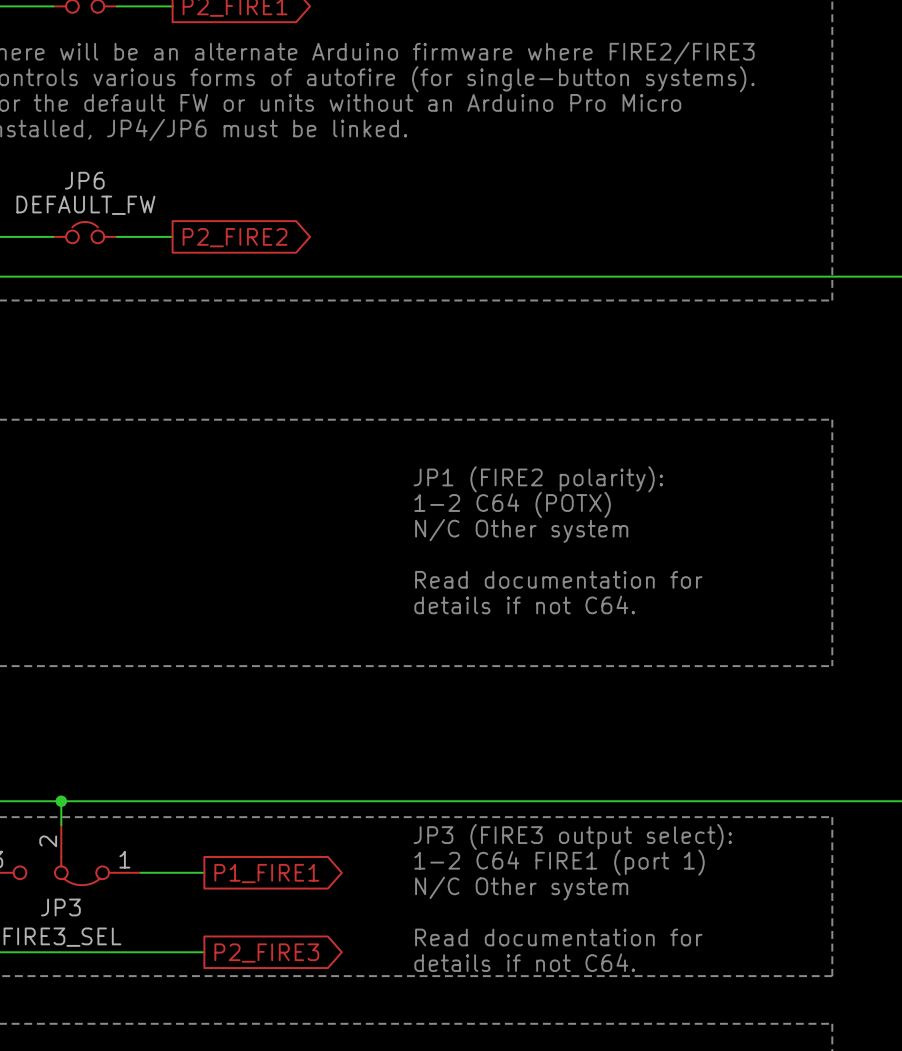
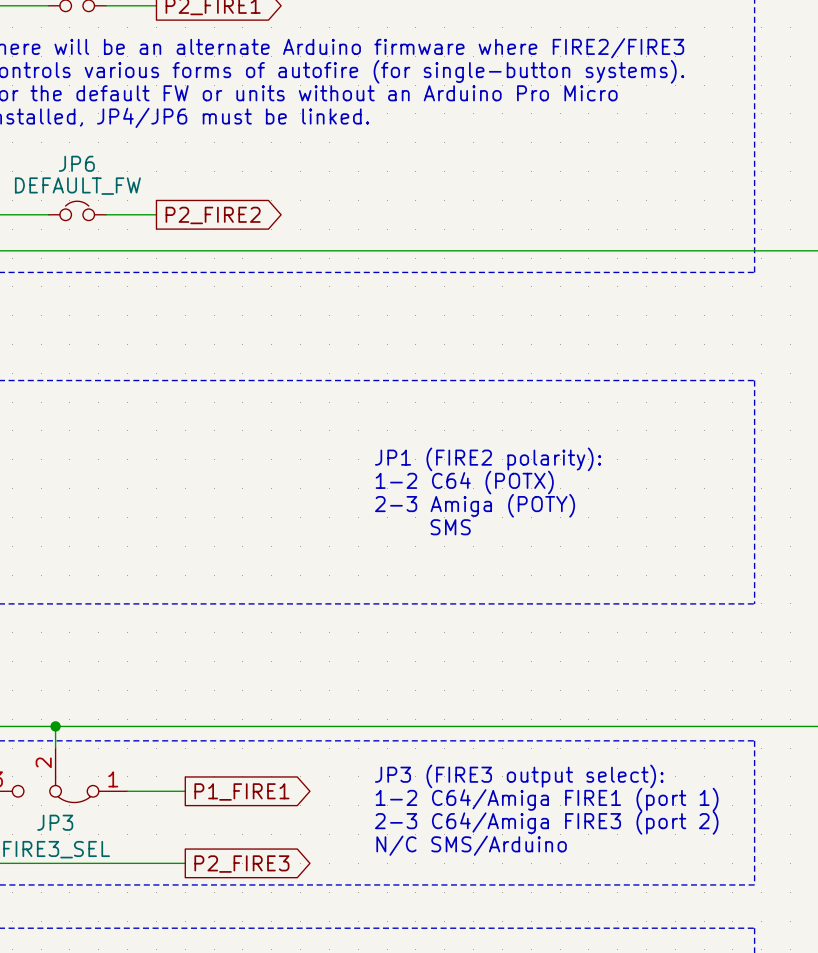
text: JP1 (FIRE2 polarity): (538, 479) -> none
text: 1-2 C64 (POTX) (512, 504) -> JP1 (FIRE2 polarity): (488, 459)
text: N/C Other system (521, 530) -> 1-2 C64 (POTX) (464, 482)
text: none -> 2-3 Amiga (POTY) (475, 505)
text: Read documentation for (558, 579) -> SMS (450, 527)
text: details if not C64. (524, 605) -> none
text: JP3 (FIRE3 output select): (572, 837) -> none
text: 1-2 C64 FIRE1 (port 1) (559, 862) -> JP3 (FIRE3 output select): (519, 776)
text: N/C Other system (521, 888) -> 1-2 C64/Amiga FIRE1 (port 1) (547, 799)
text: none -> 2-3 C64/Amiga FIRE3 (port 2) (546, 822)
text: Read documentation for (558, 937) -> N/C SMS/Arduino (471, 845)
text: details if not C64. (524, 962) -> none

